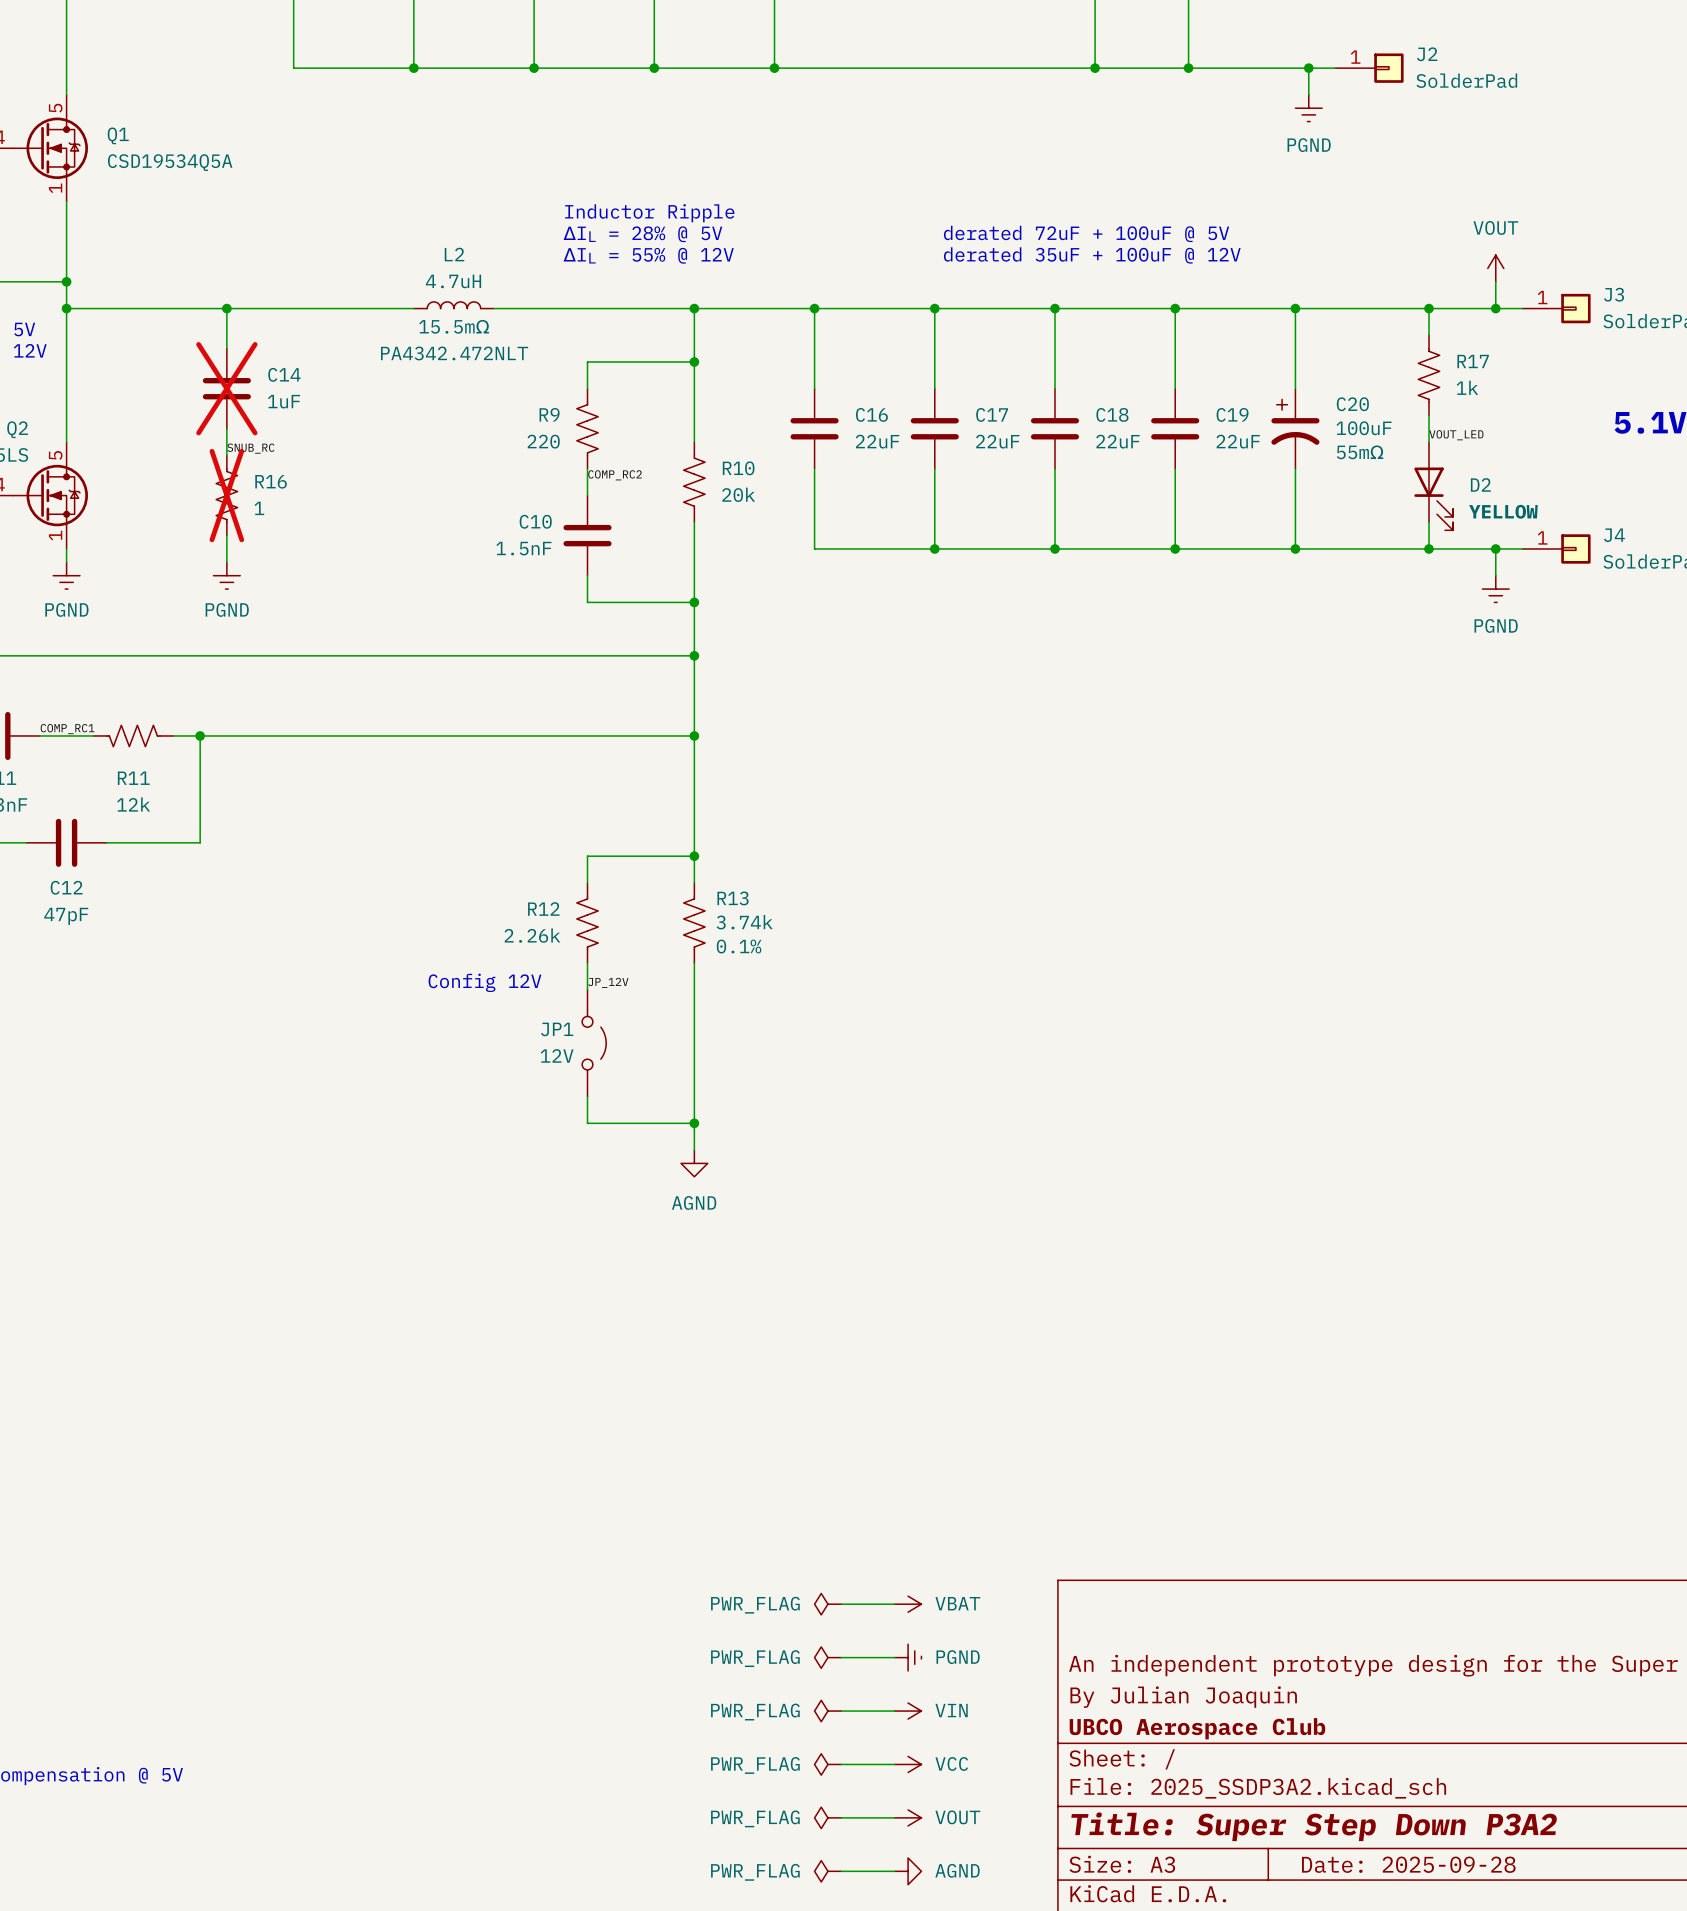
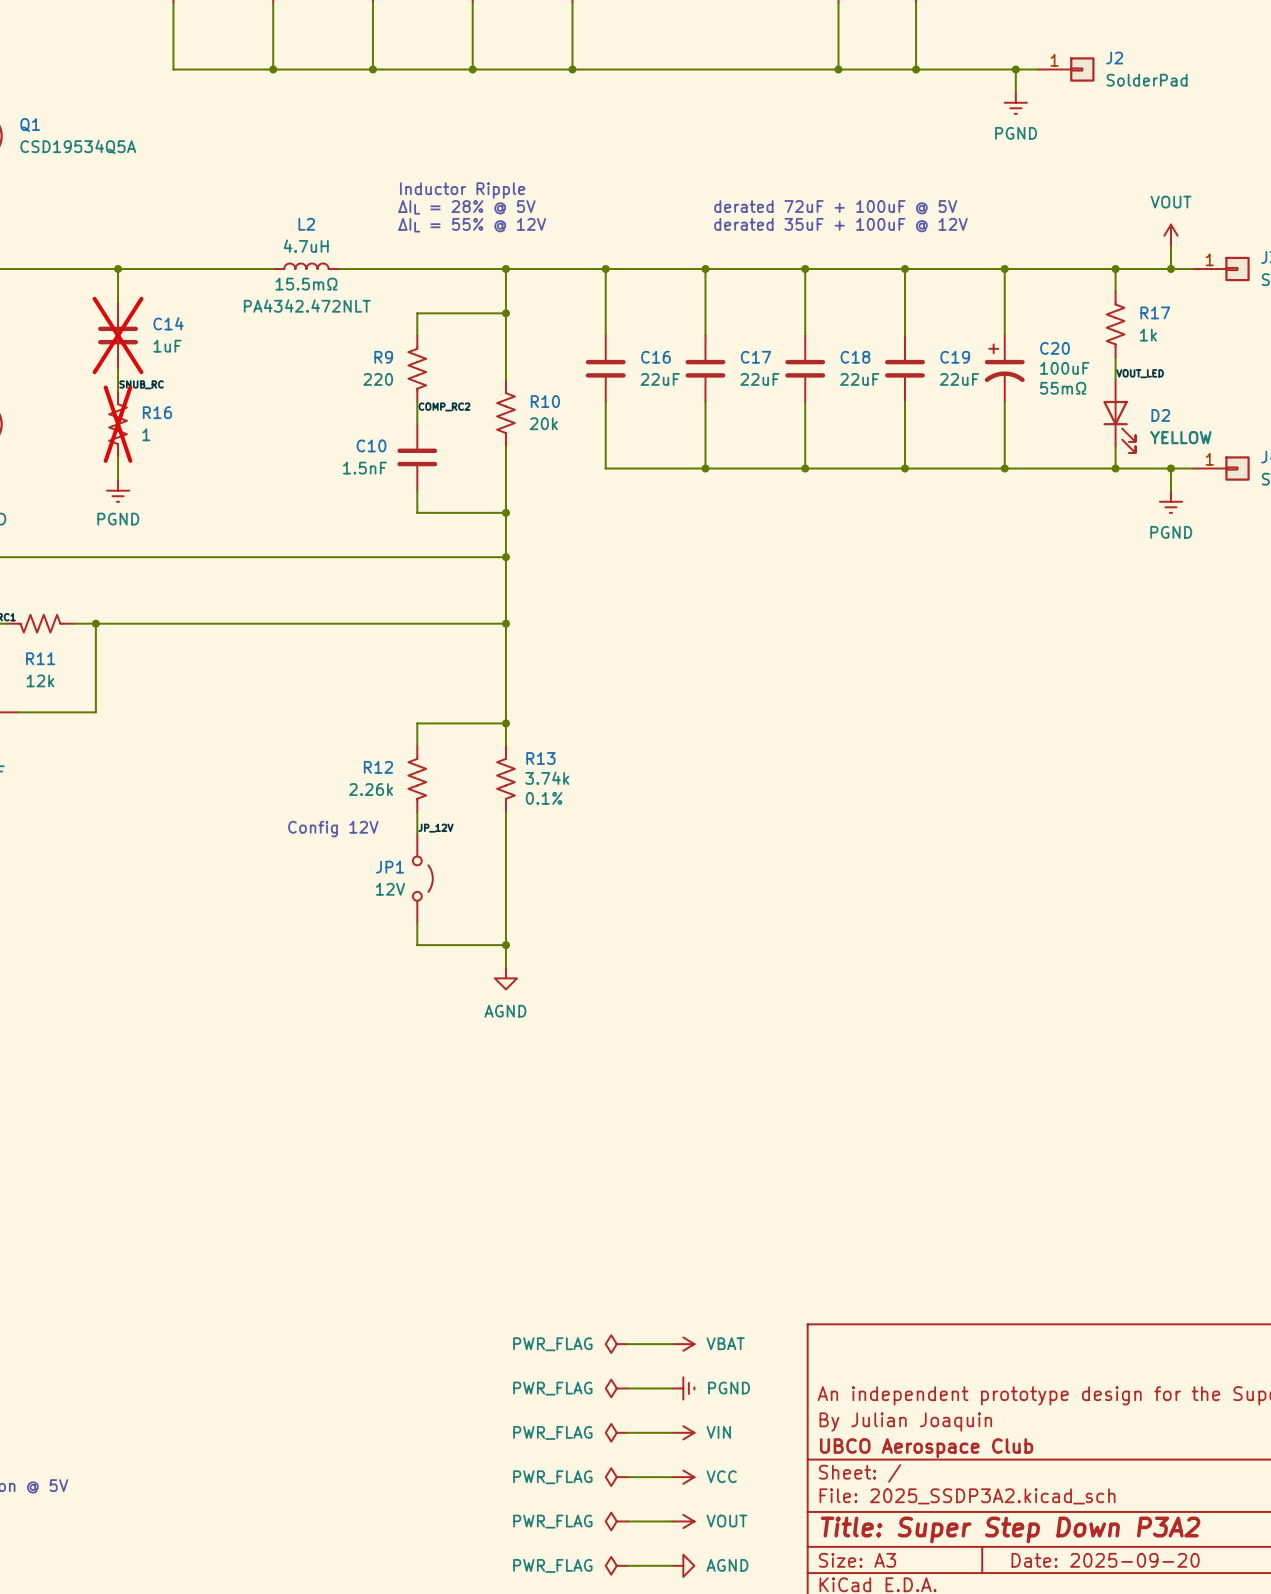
title block: Date: 2025-09-28 (1408, 1864) -> Date: 2025-09-20 (1105, 1560)

